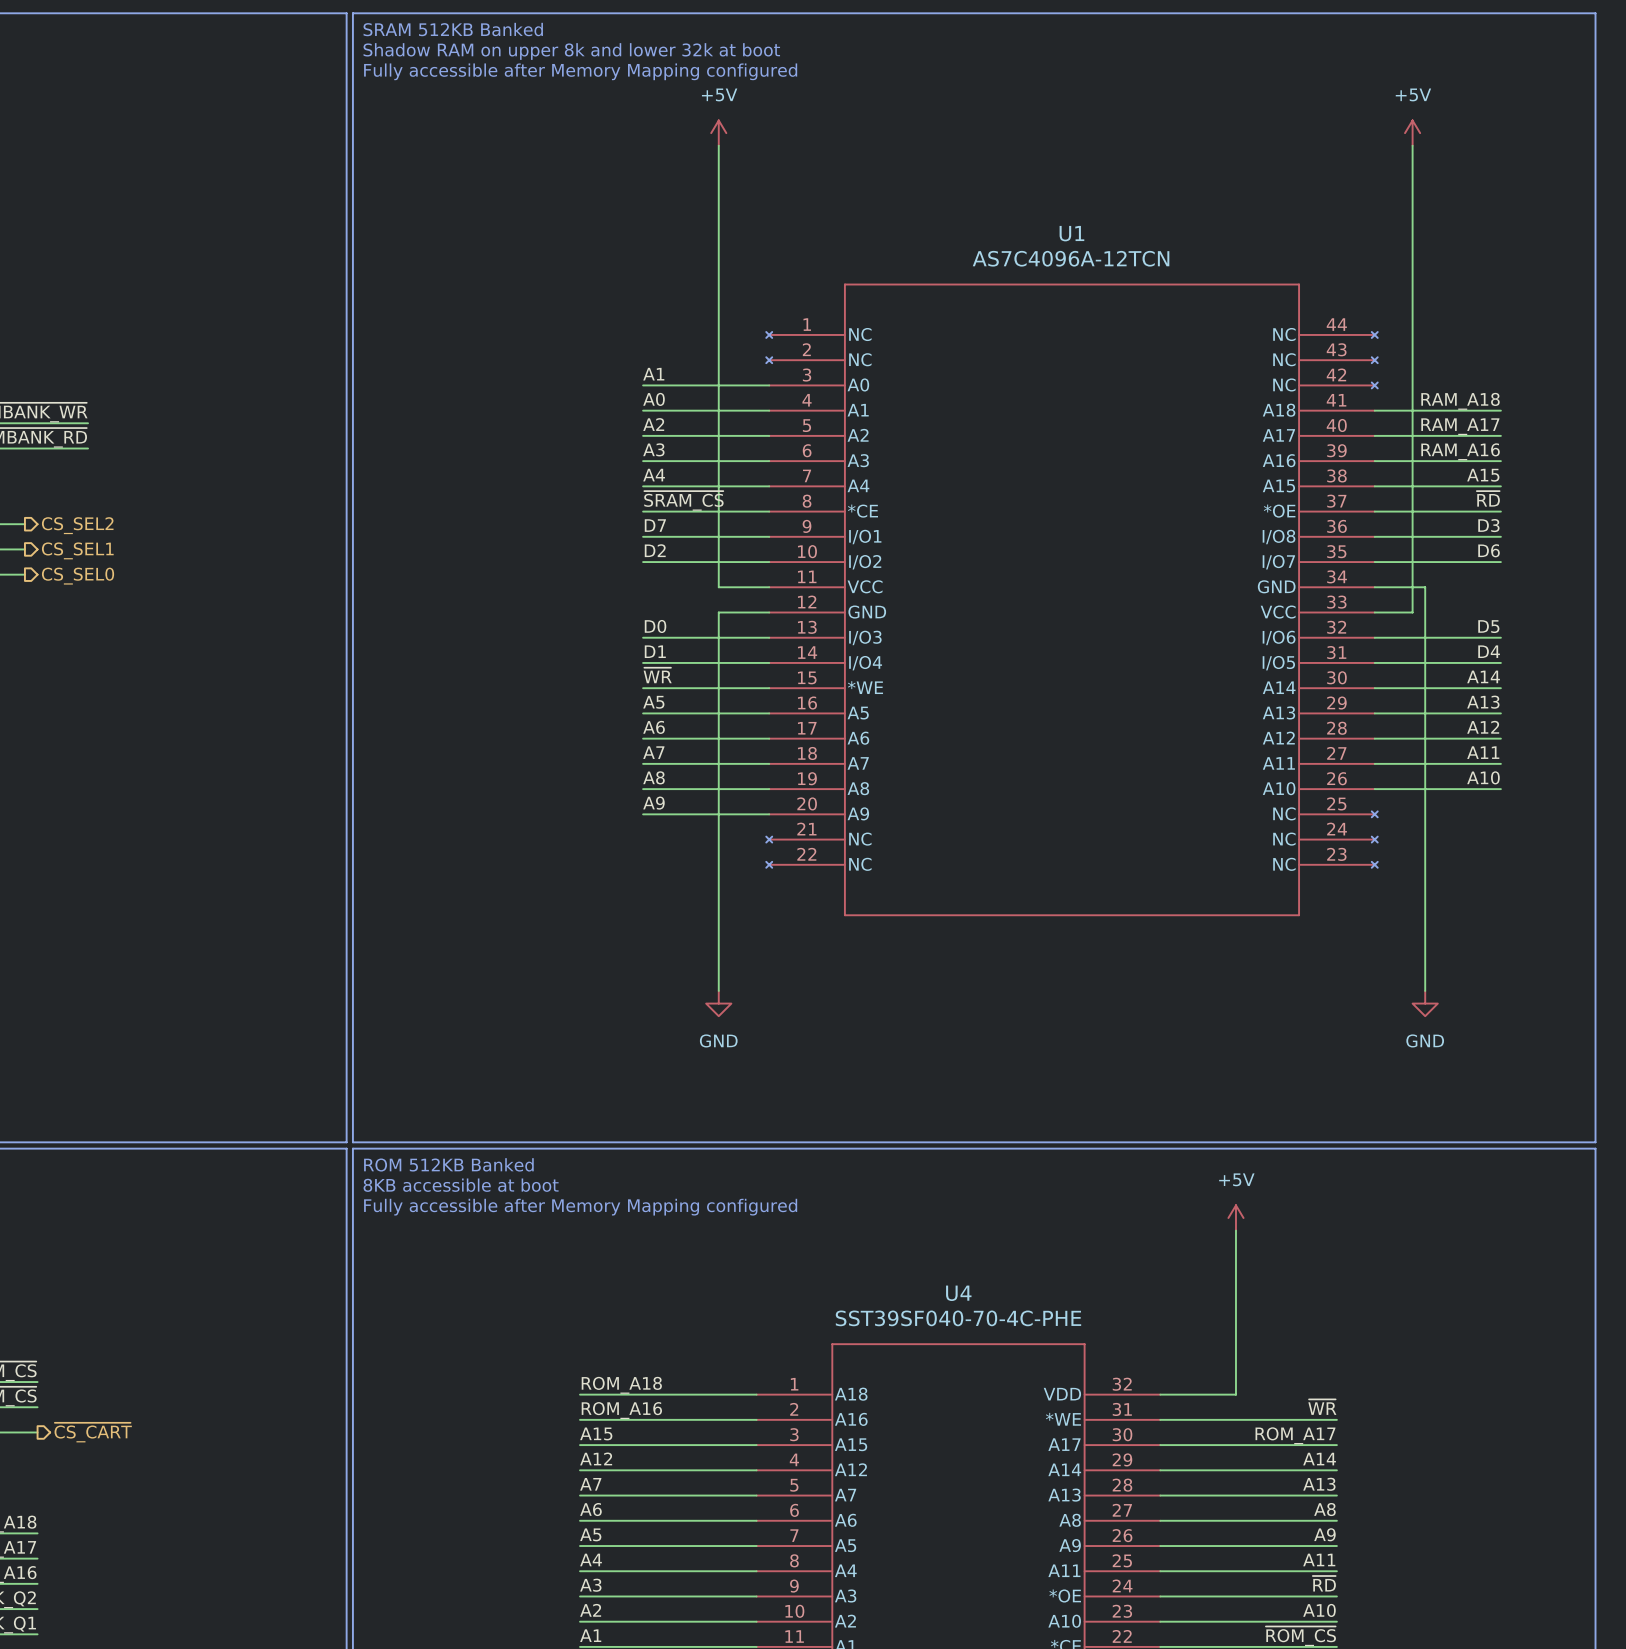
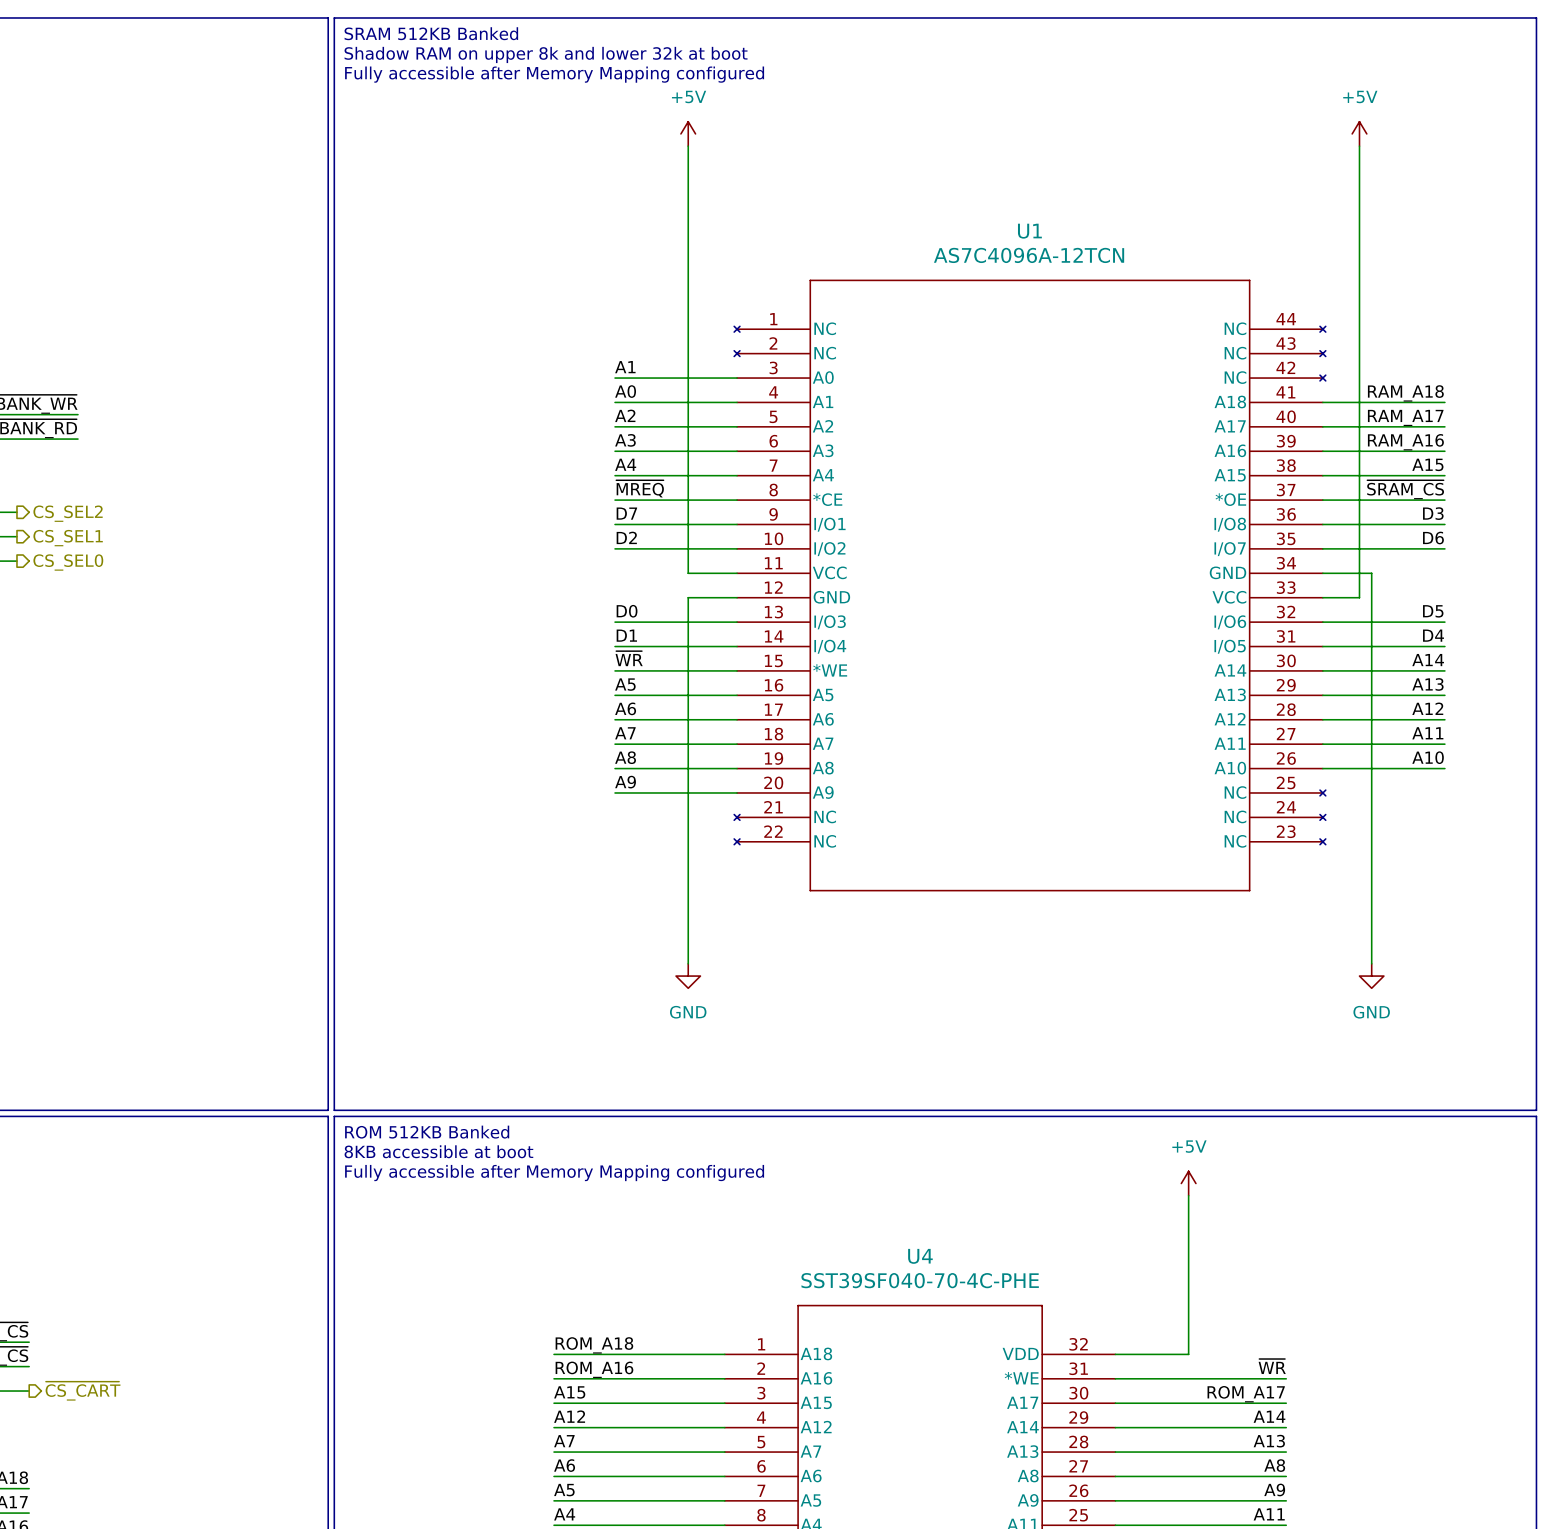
label: ~{RD} (1488, 498) -> ~{SRAM_CS} (1405, 489)
label: ~{SRAM_CS} (683, 500) -> ~{MREQ} (640, 488)

